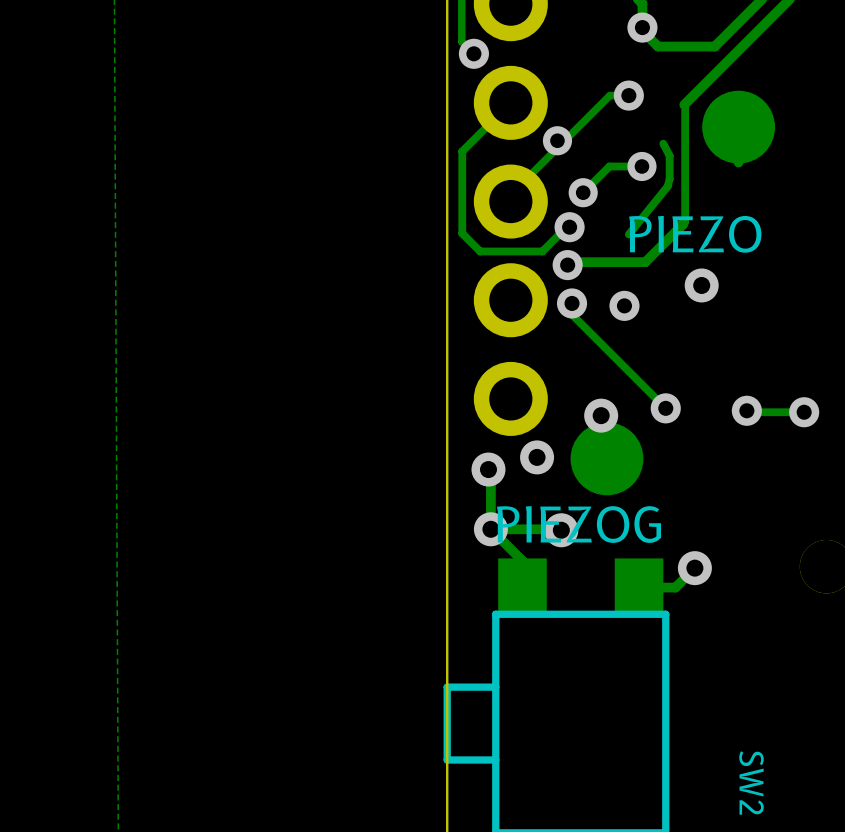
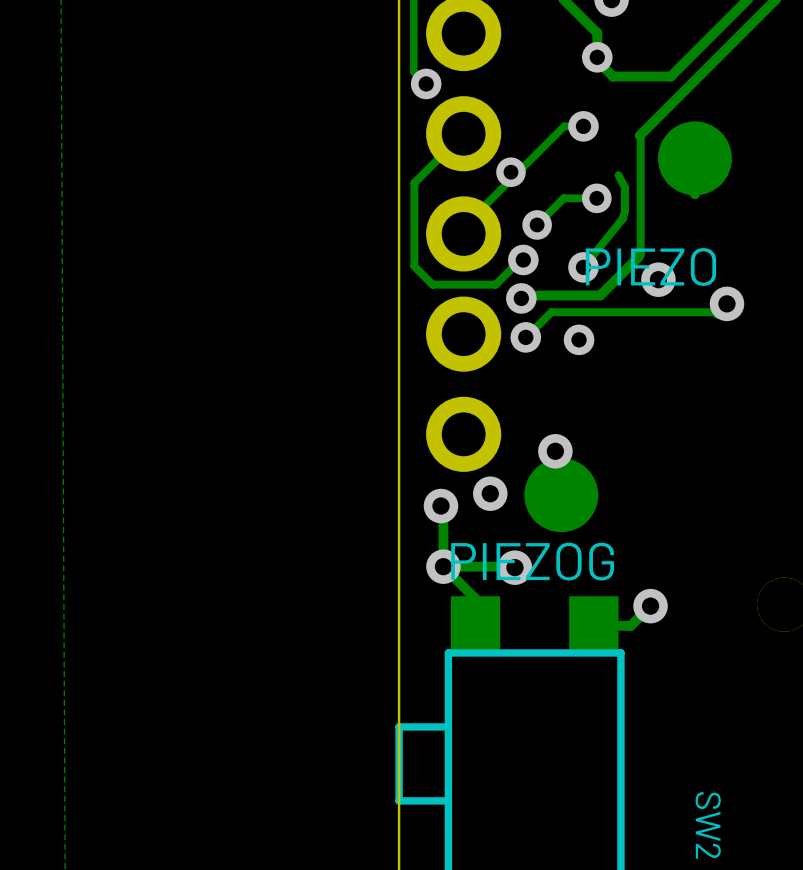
via: none -> (583, 267)
via: none -> (658, 279)
via: none -> (726, 303)
via: (701, 285) -> none
track: (572, 303) (572, 315) (665, 408) -> (526, 337) (551, 312) (717, 313) (726, 303)
via: (665, 408) -> none
track: (746, 410) (804, 412) -> none
via: (746, 410) -> none
via: (804, 412) -> none

